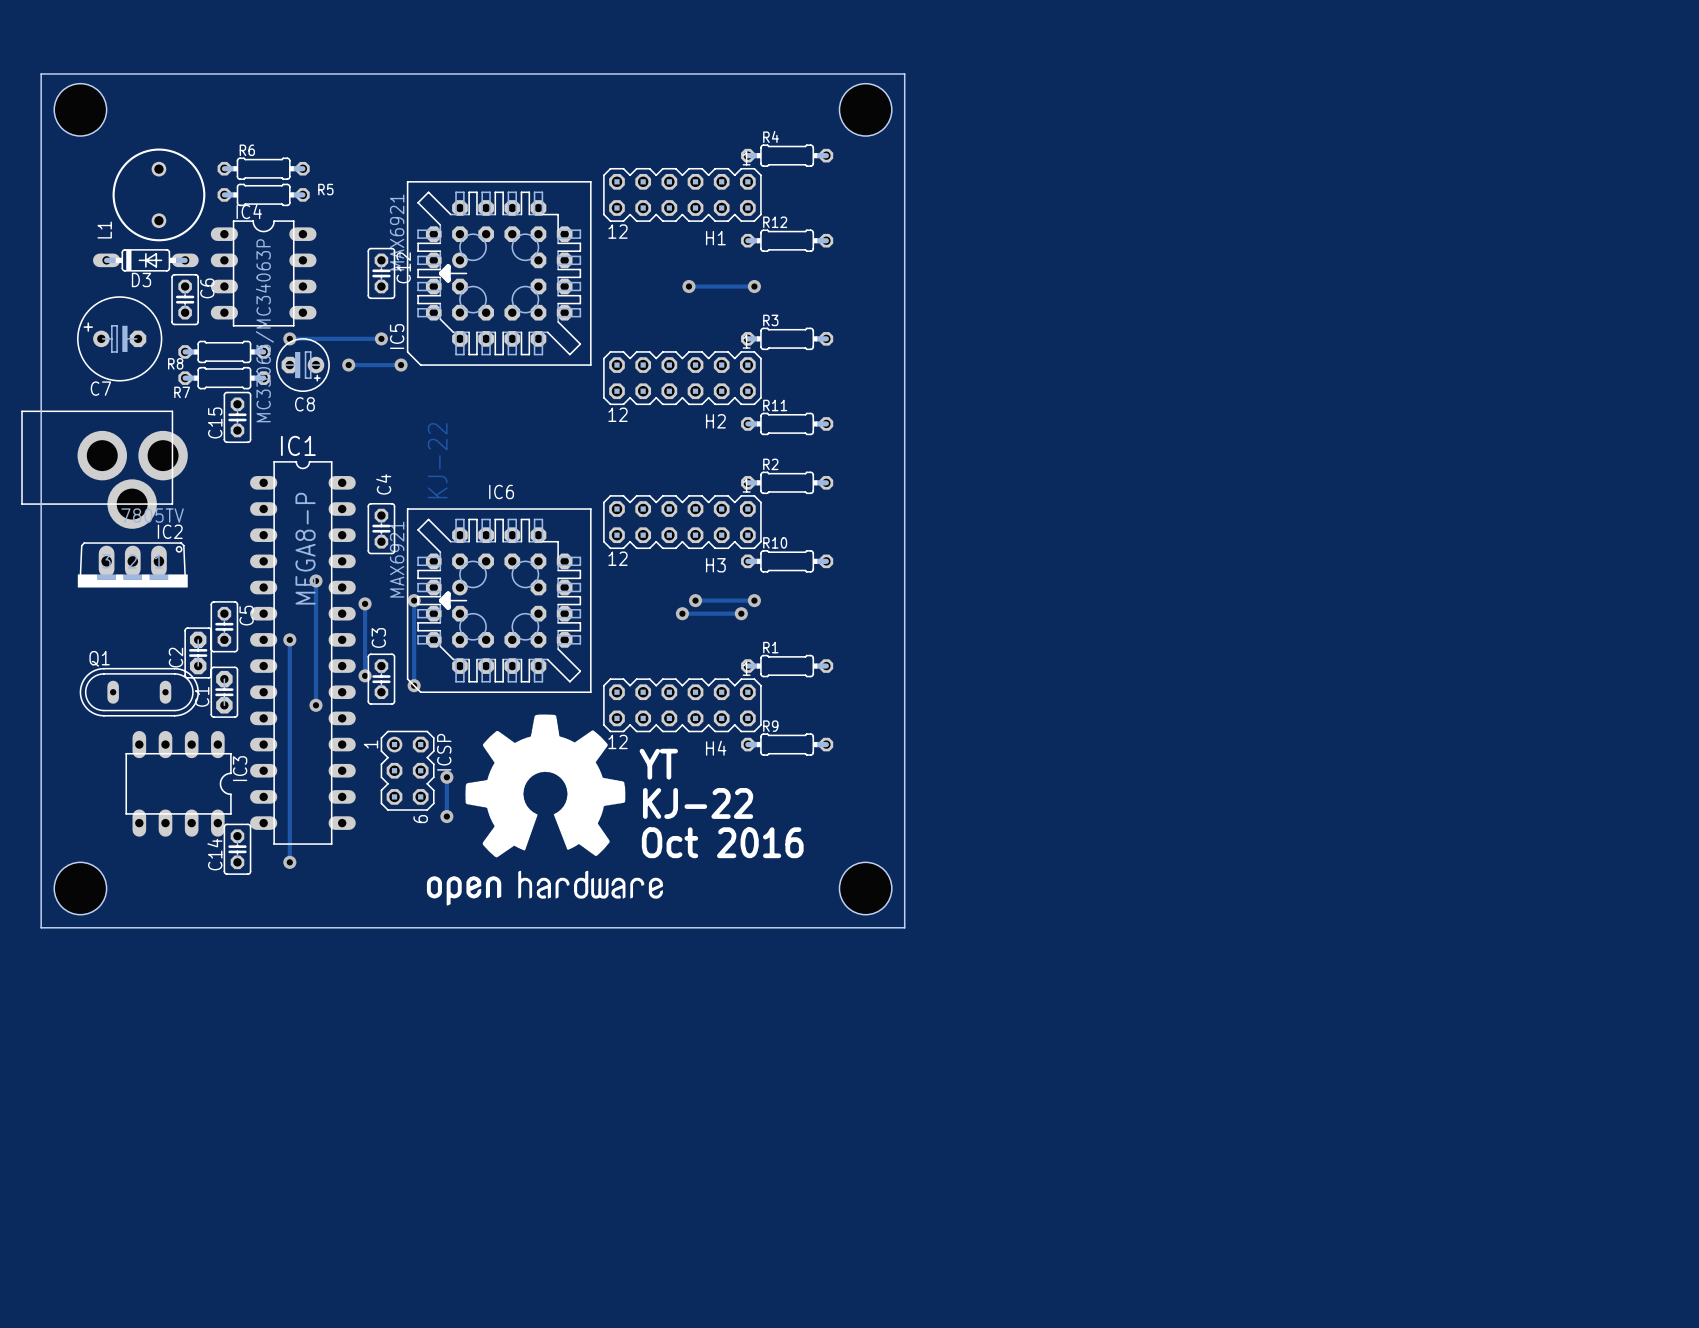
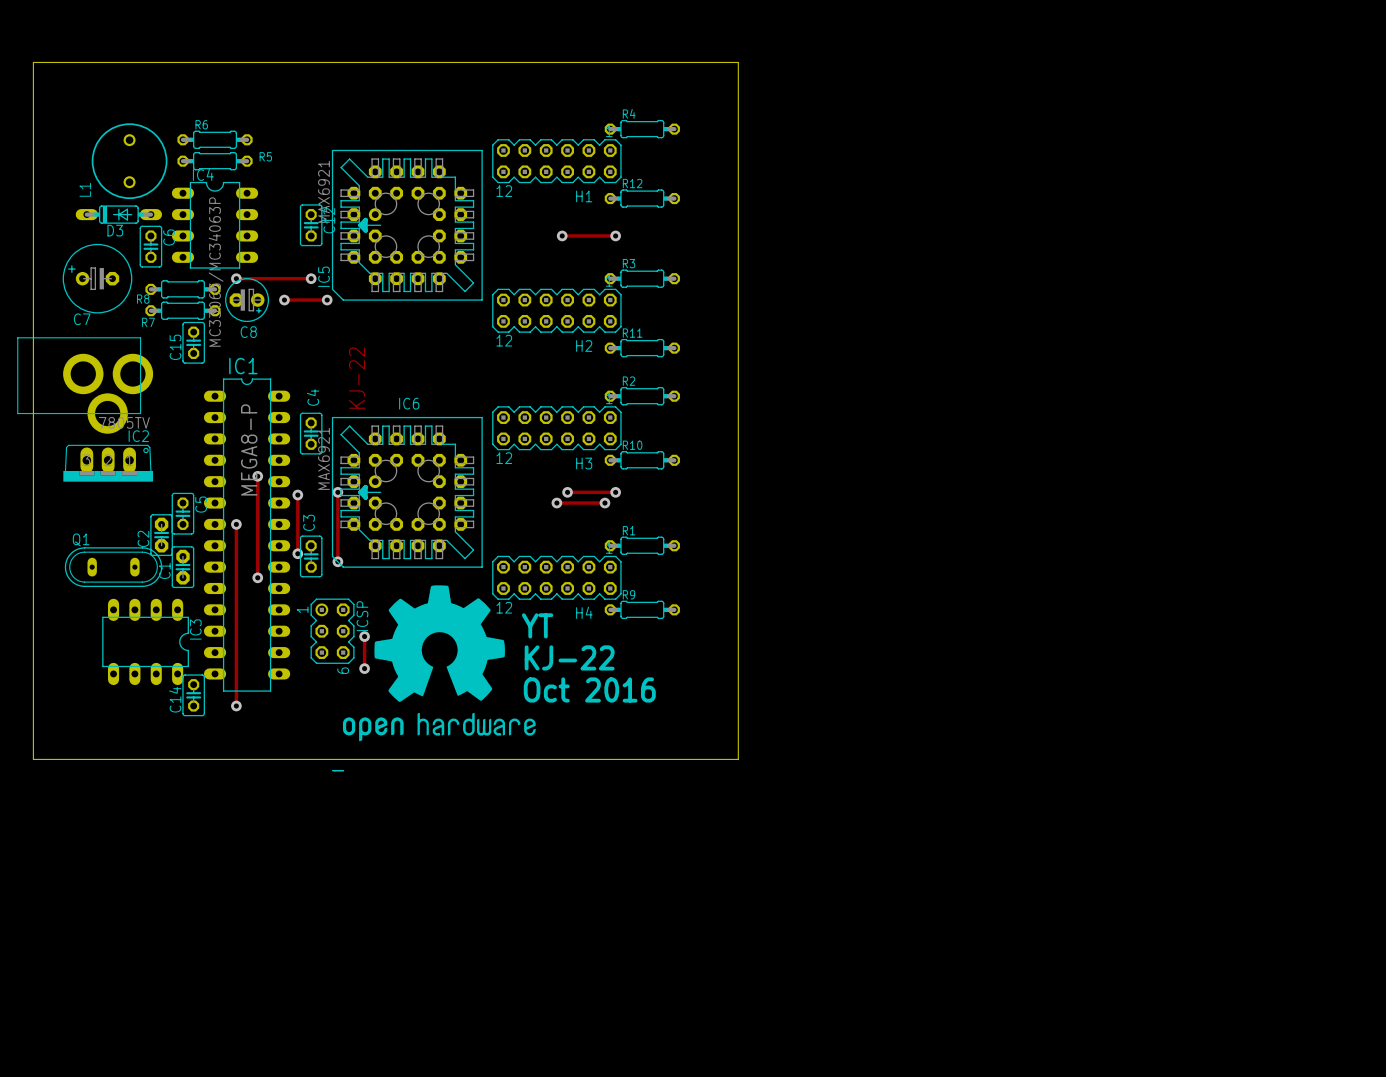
hole: (80, 109) -> none
hole: (865, 109) -> none
drawing shape: [426, 714, 664, 906] -> [332, 585, 536, 771]
hole: (80, 888) -> none
hole: (865, 888) -> none

